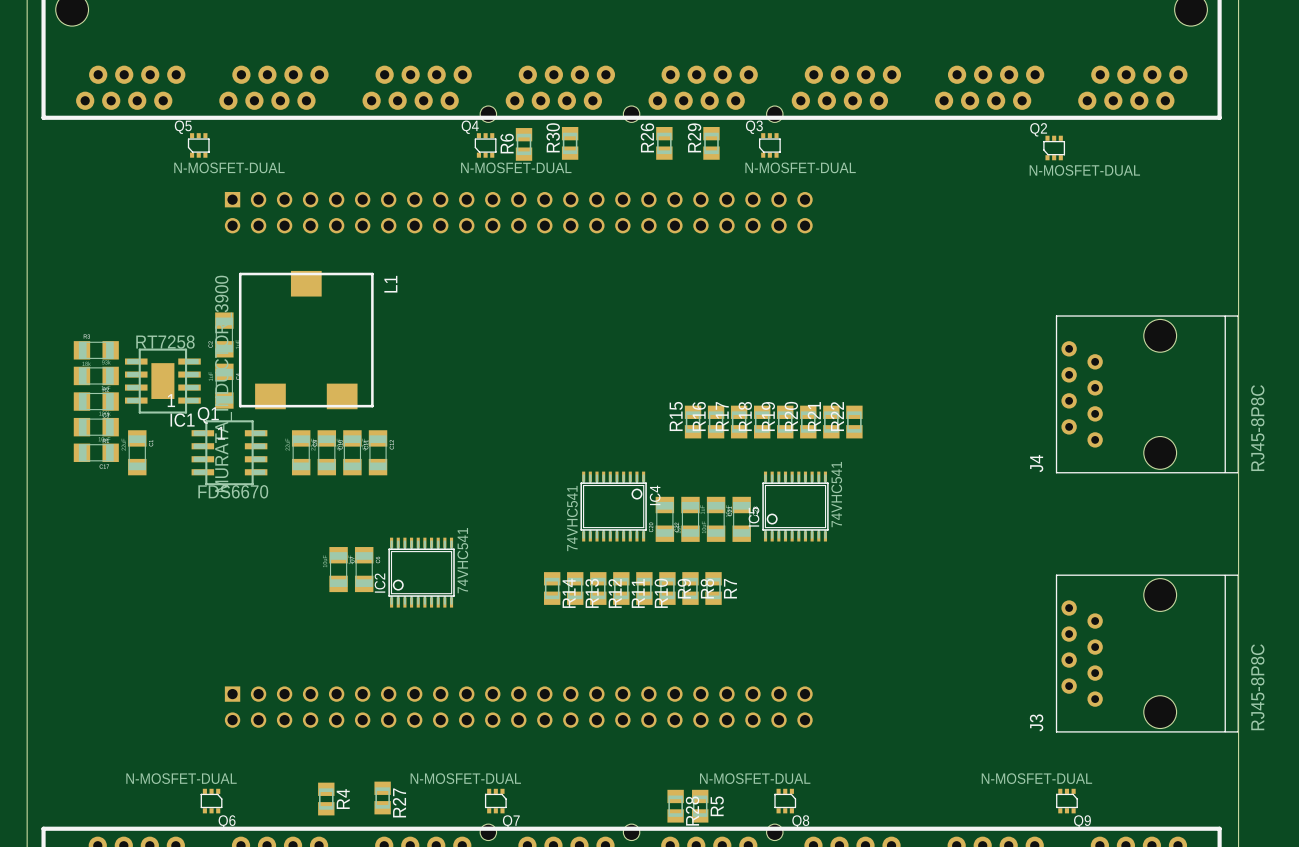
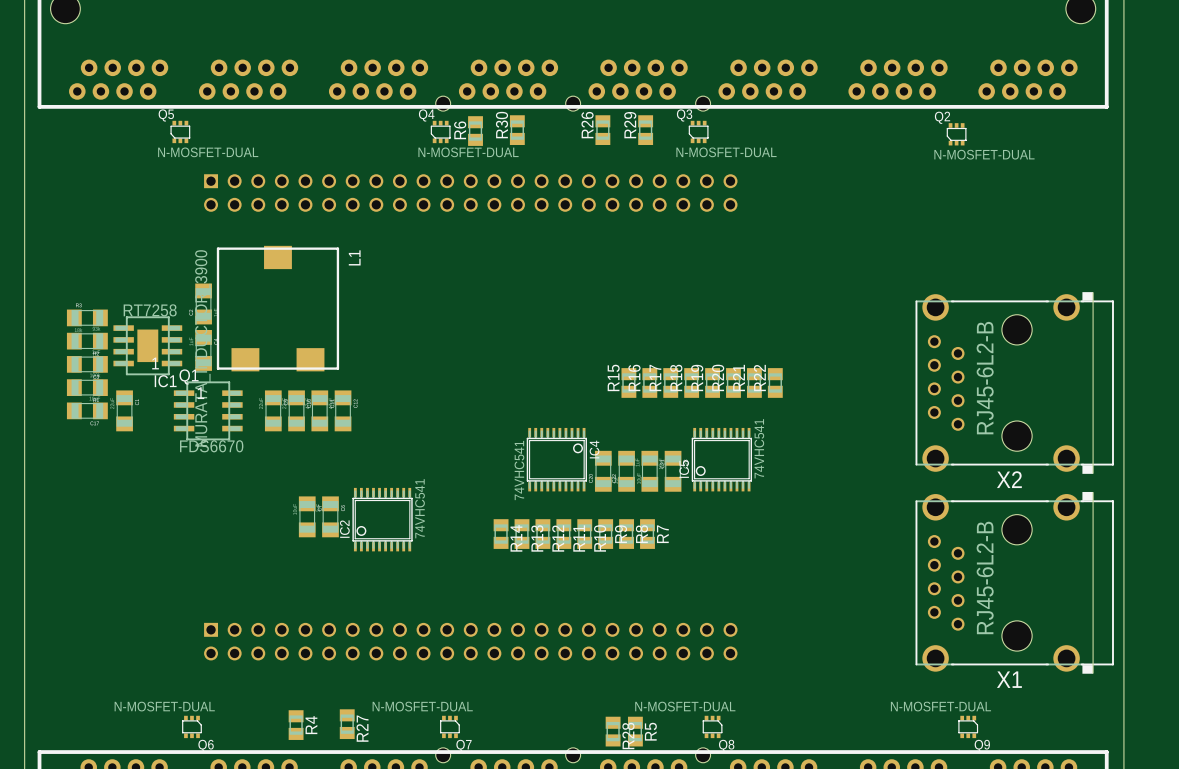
J4: RJ45-8P8C (1147, 394) -> none
X2: none -> RJ45-6L2-B (1014, 382)
X1: none -> RJ45-6L2-B (1014, 582)
J3: RJ45-8P8C (1147, 653) -> none

